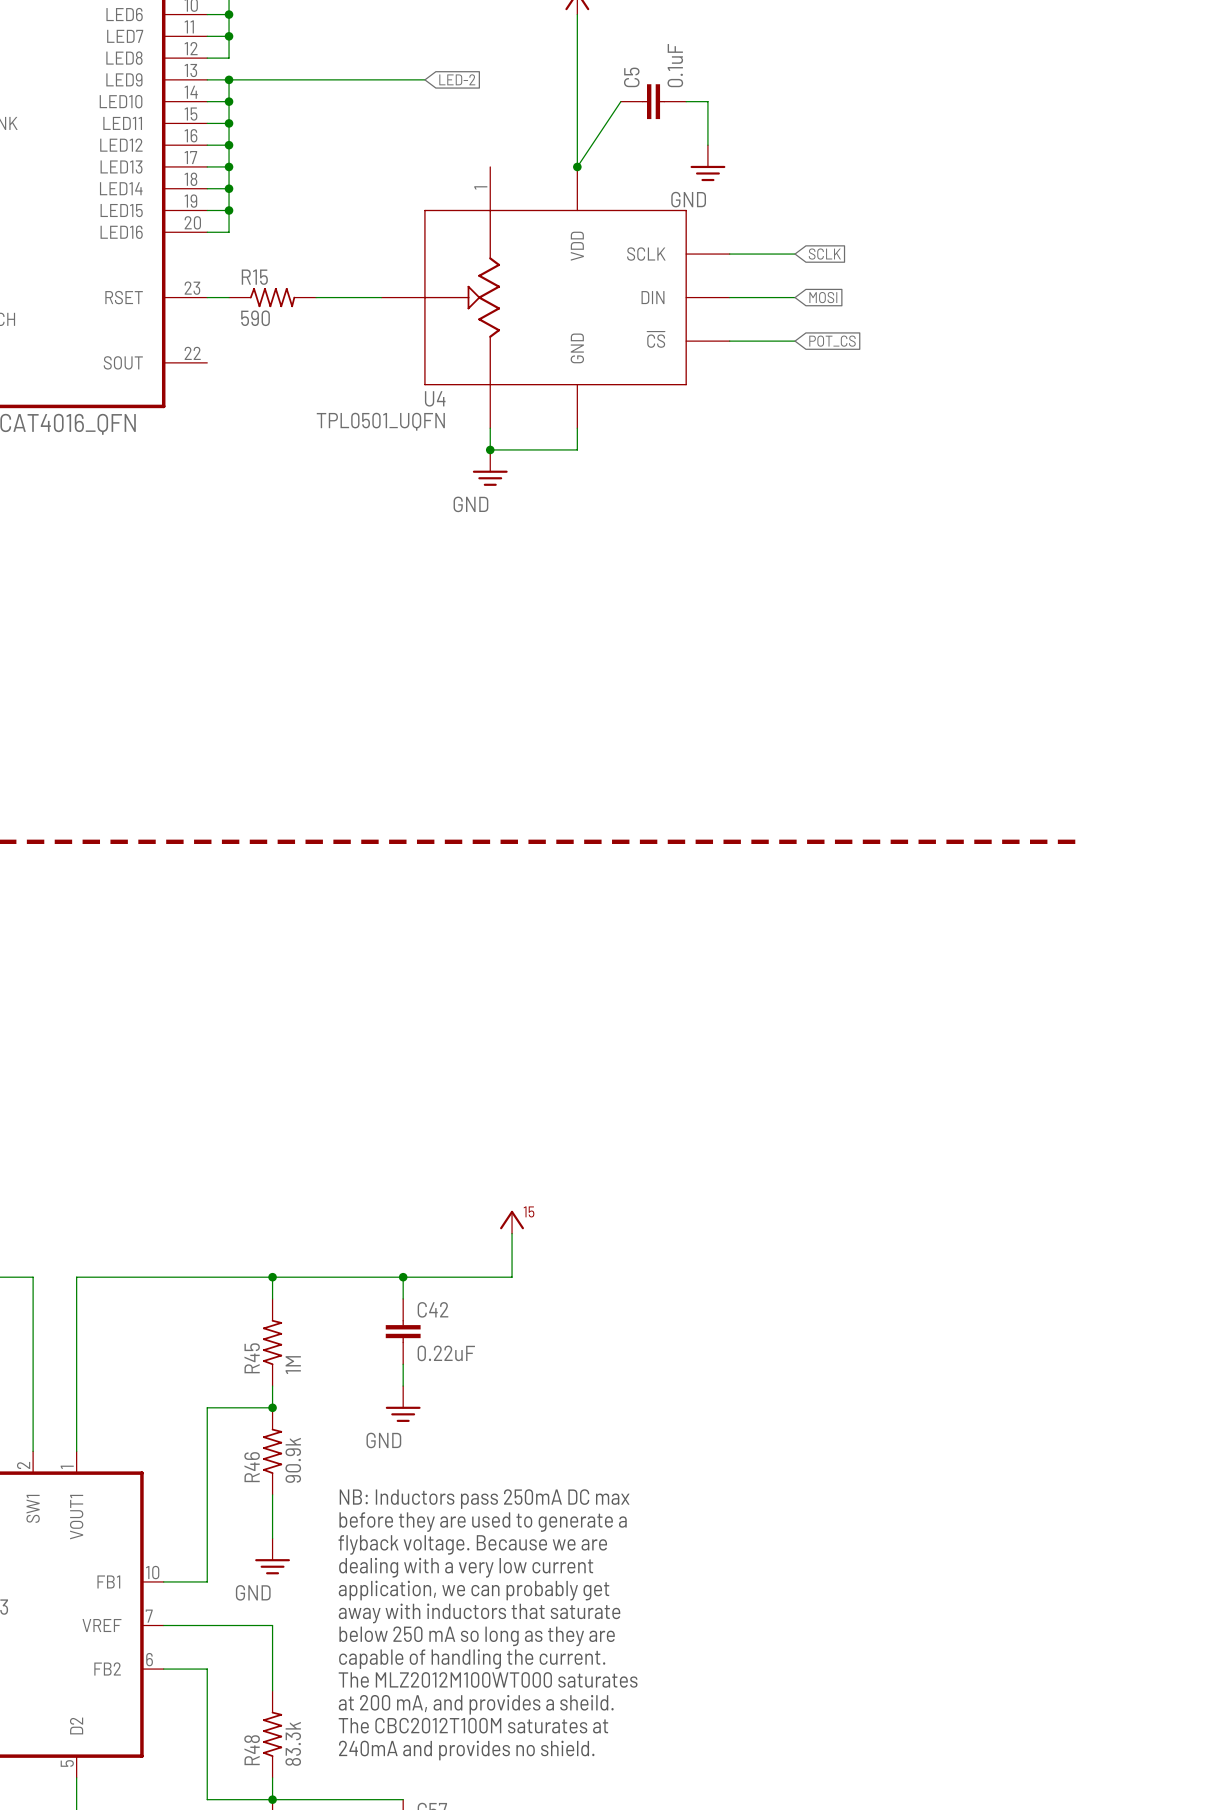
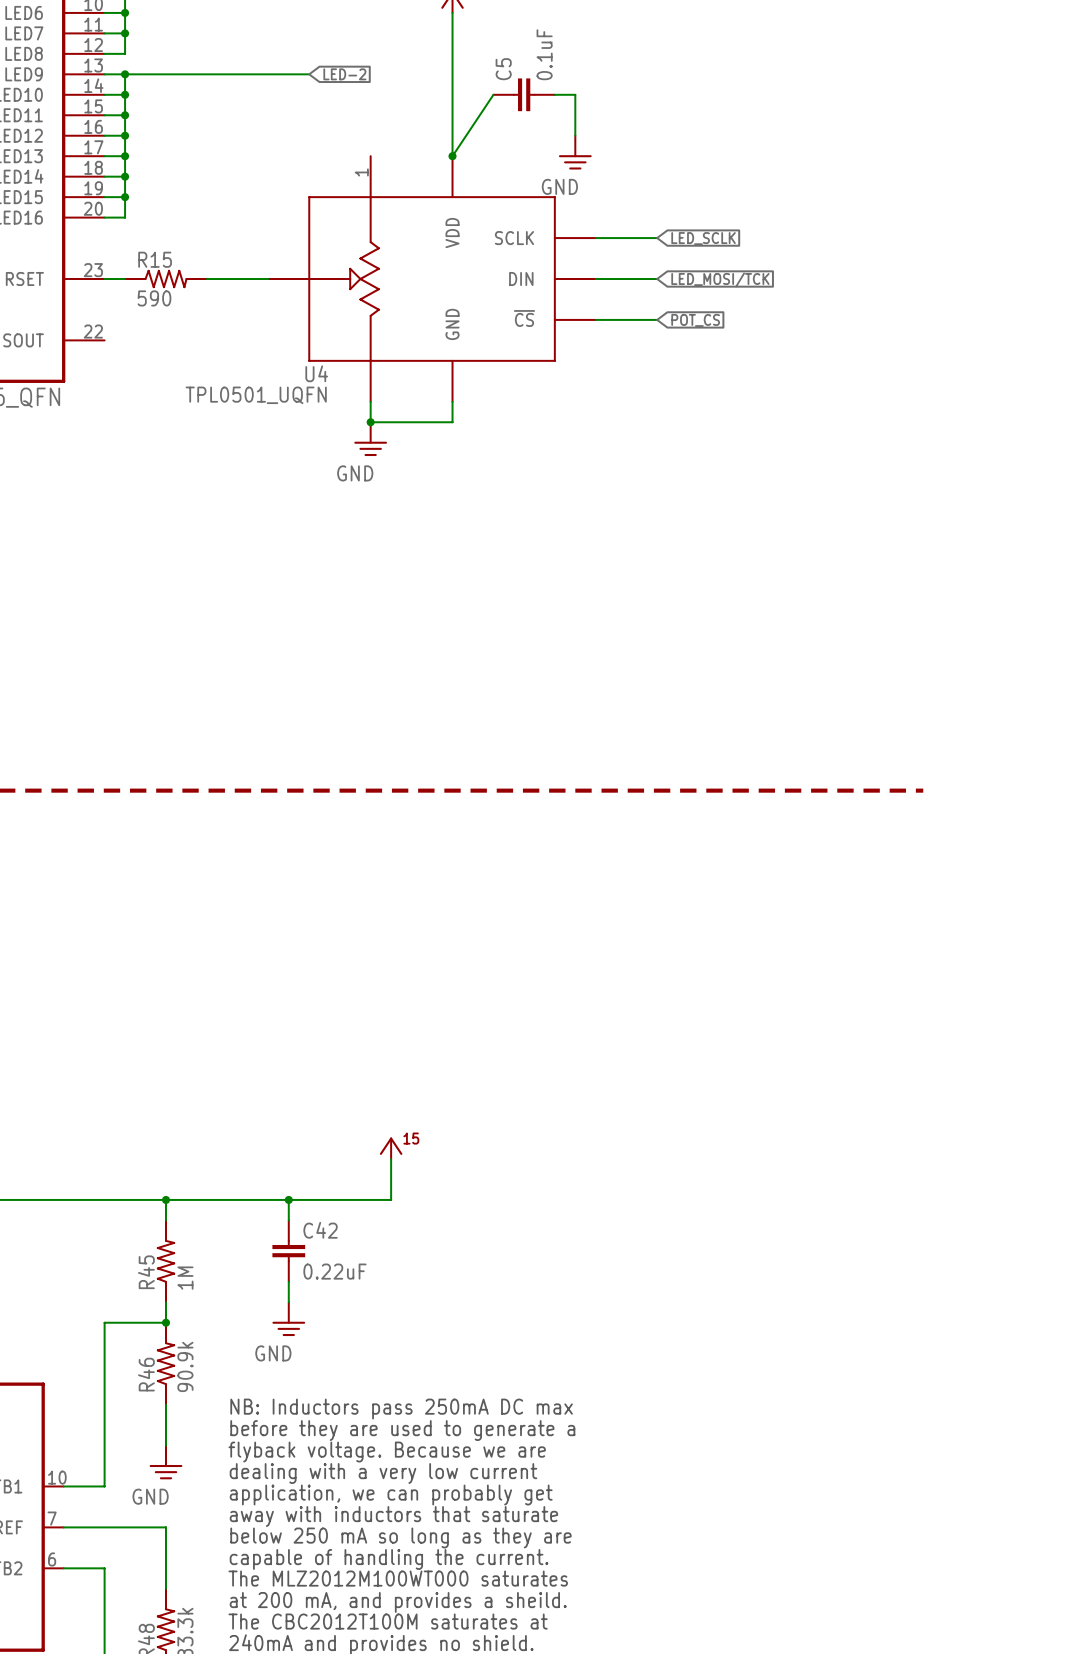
global label: SCLK (824, 254) -> LED_SCLK (703, 238)
global label: MOSI (823, 297) -> LED_MOSI/TCK (720, 279)

